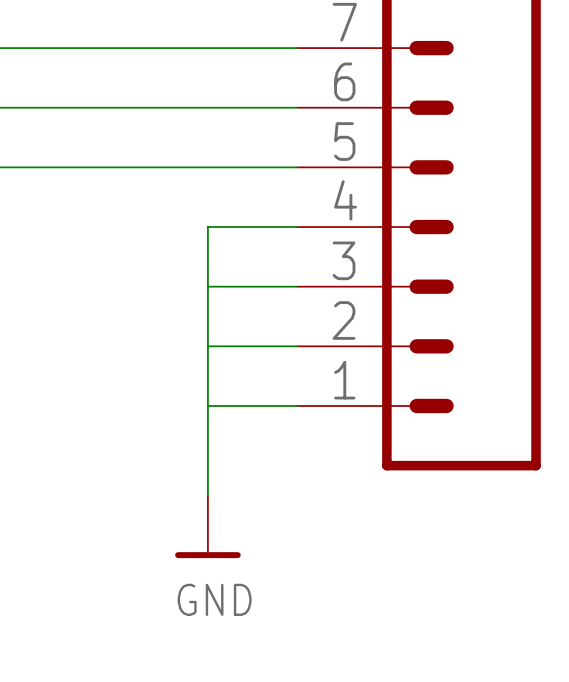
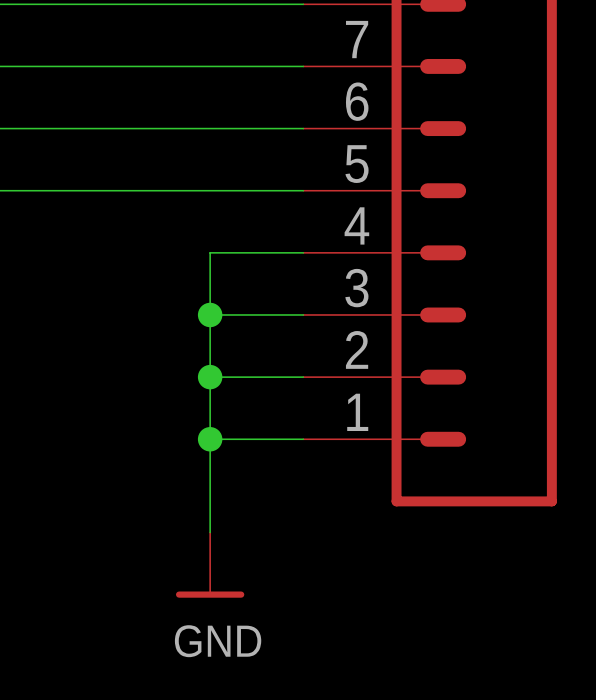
junction: none -> (210, 314)
junction: none -> (210, 377)
junction: none -> (210, 439)

